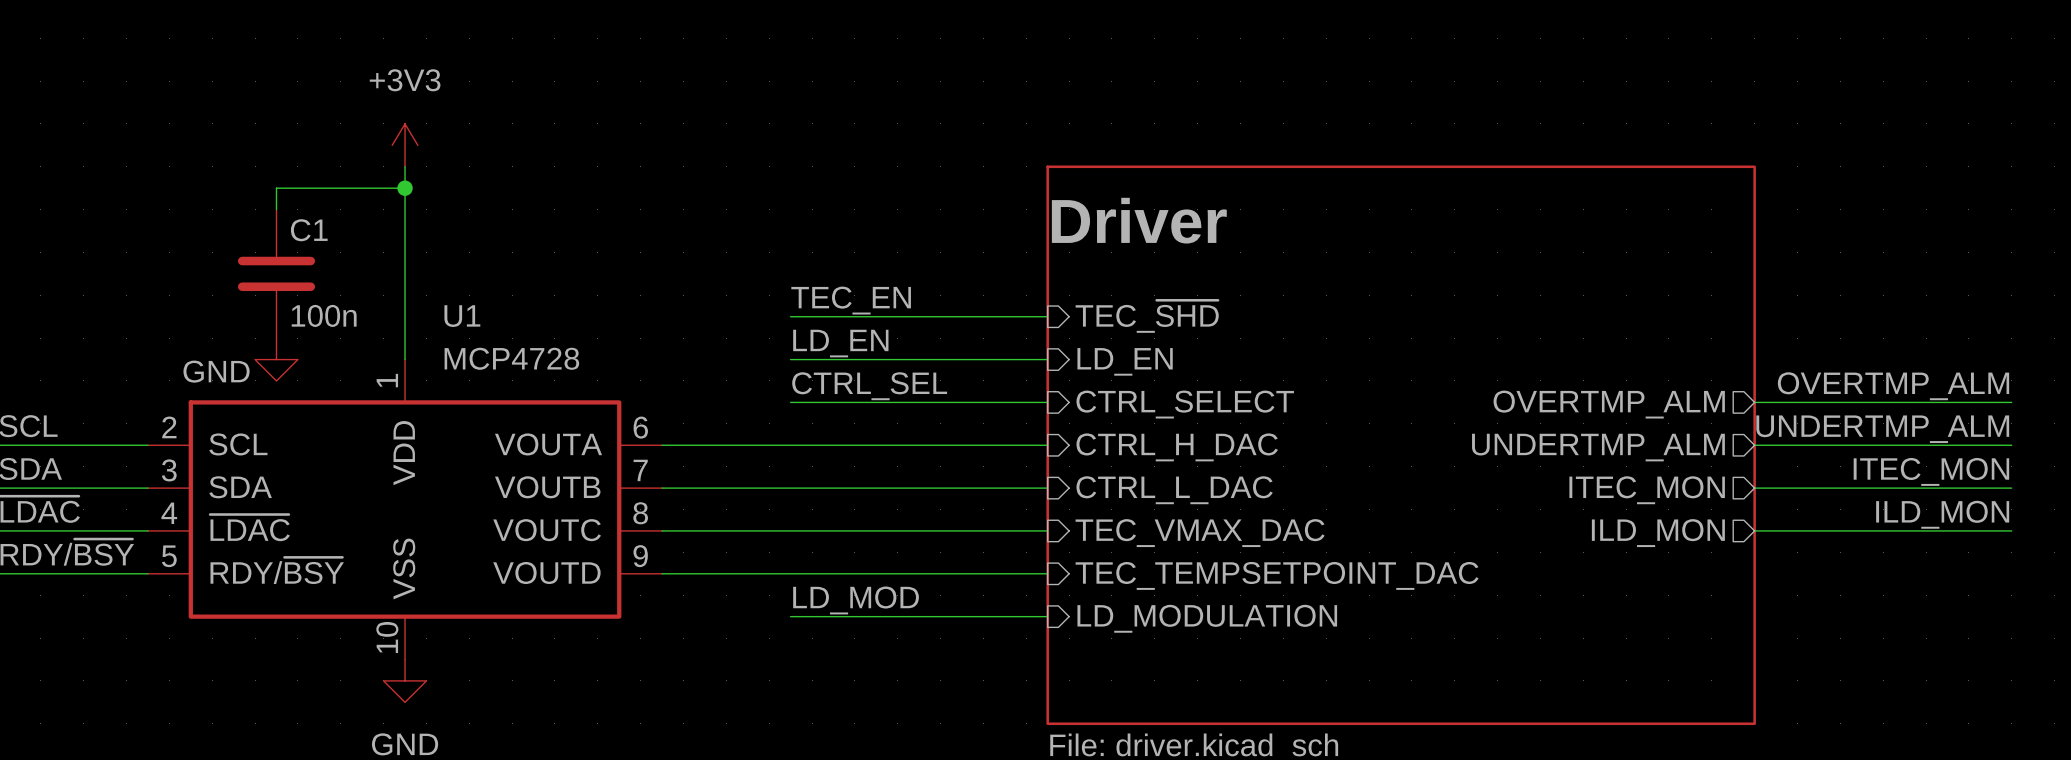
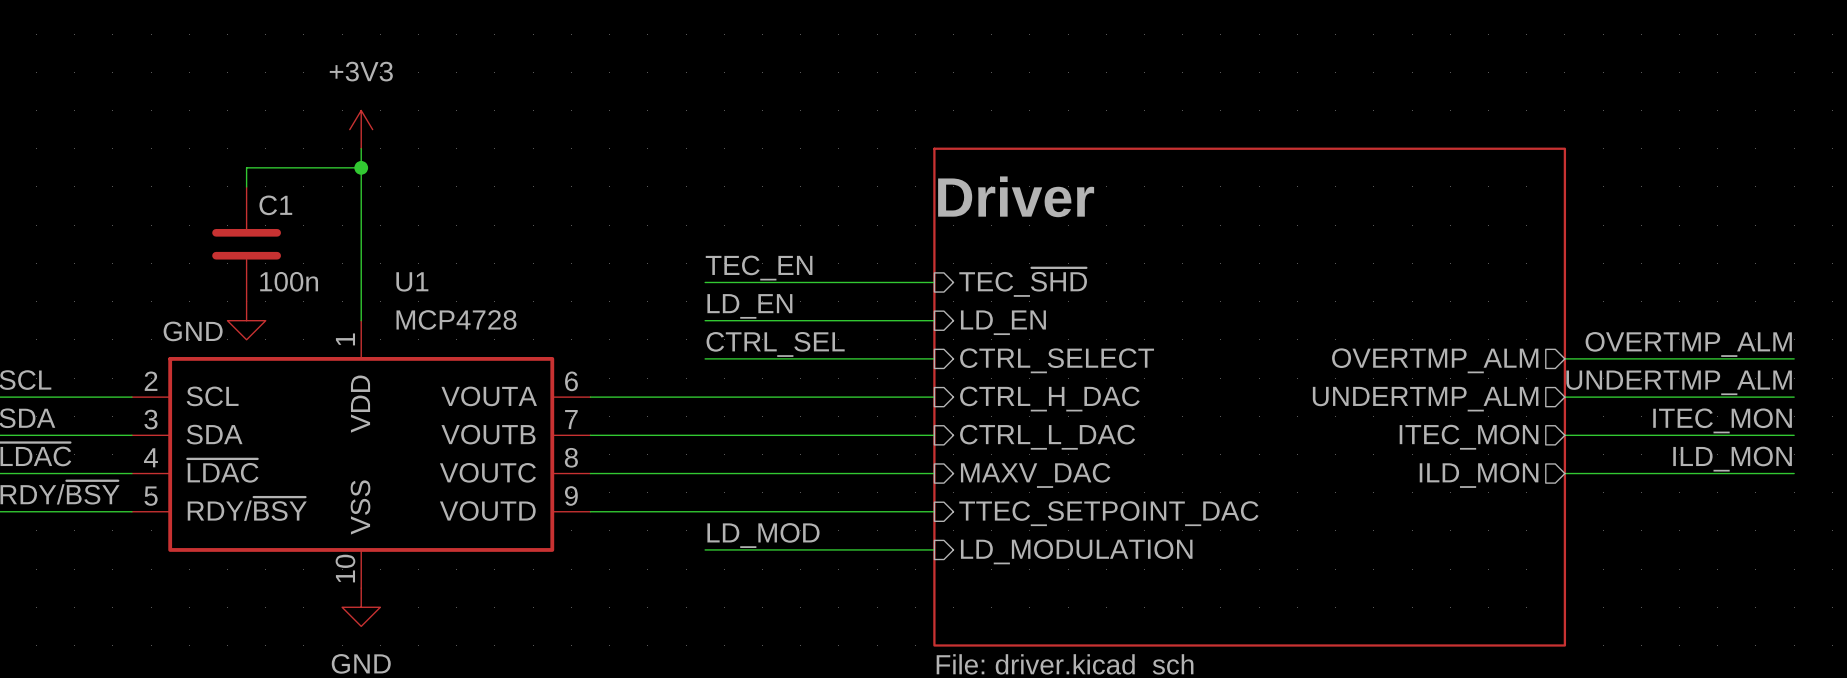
sheet pin: TEC_VMAX_DAC (1200, 533) -> MAXV_DAC (1035, 475)
sheet pin: TEC_TEMPSETPOINT_DAC (1277, 575) -> TTEC_SETPOINT_DAC (1108, 513)

